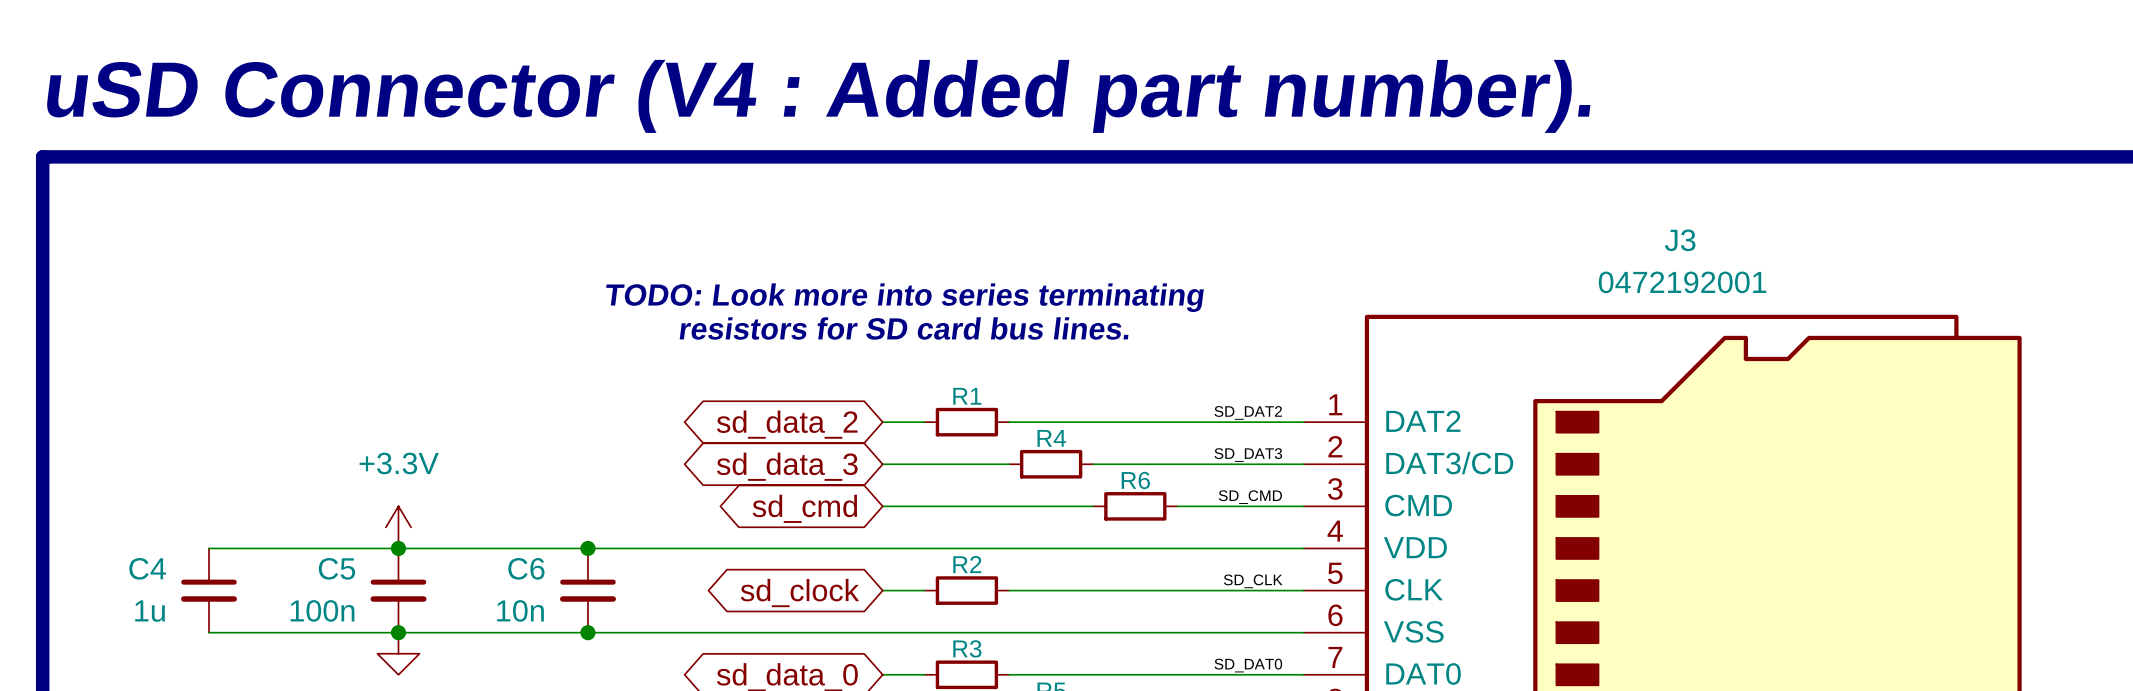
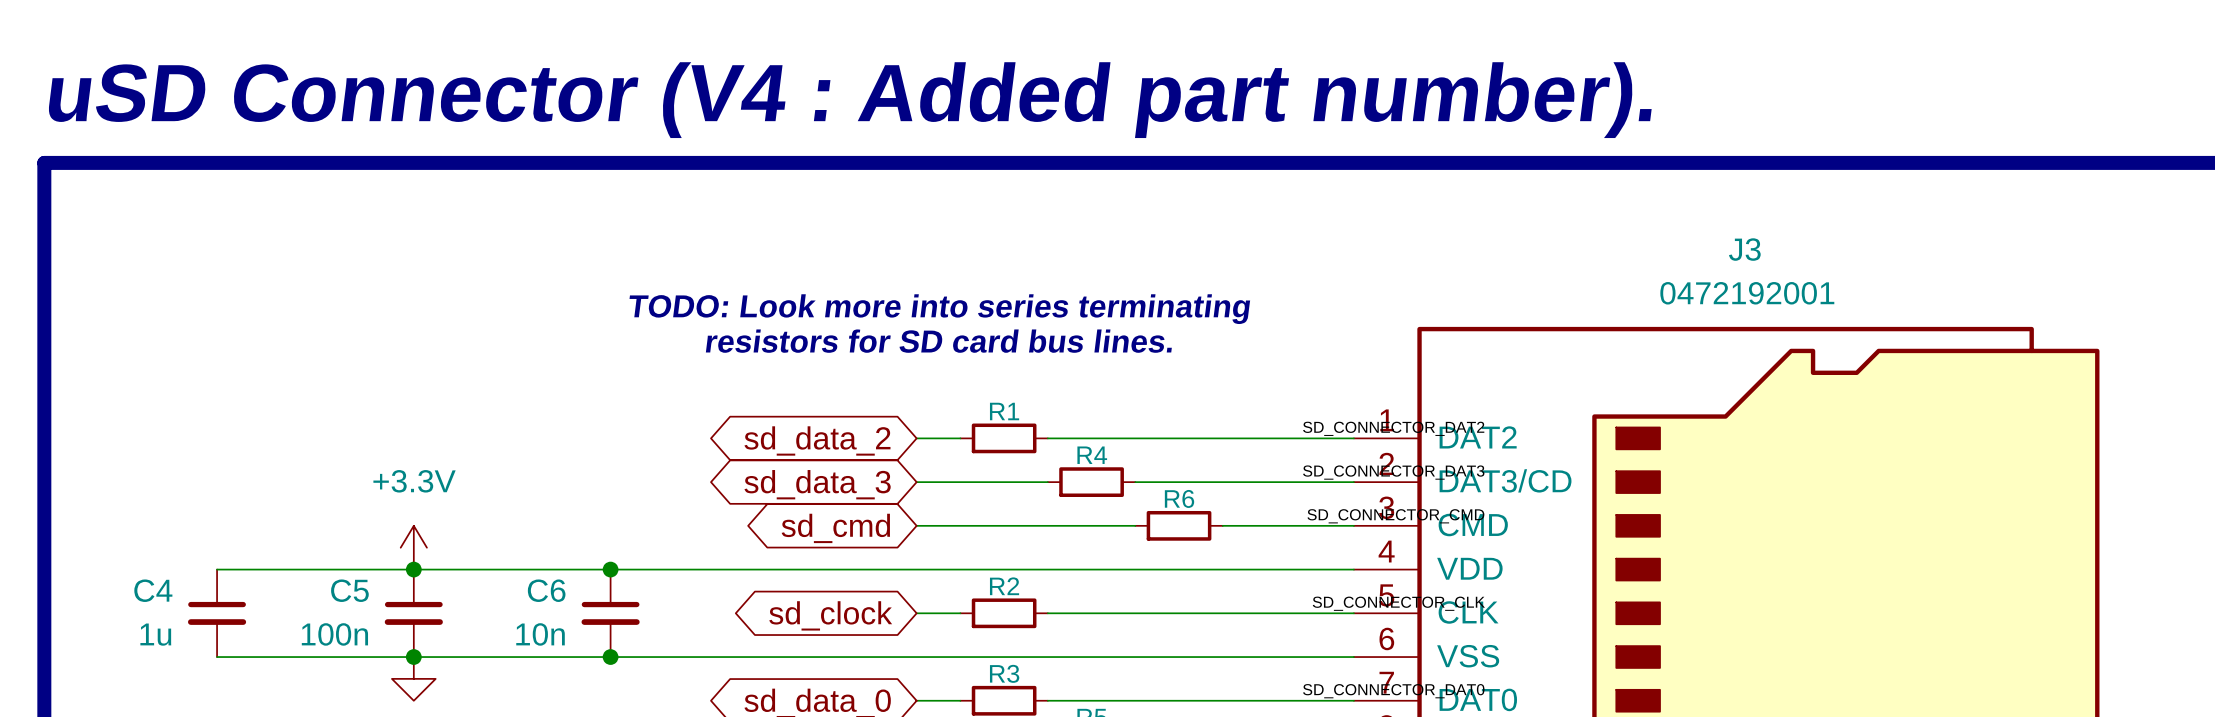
label: SD_DAT2 (1248, 412) -> none
label: none -> SD_CONNECTOR_DAT2 (1393, 428)
label: SD_DAT3 (1248, 455) -> none
label: none -> SD_CONNECTOR_DAT3 (1393, 472)
label: SD_CMD (1250, 497) -> none
label: none -> SD_CONNECTOR_CMD (1395, 516)
label: SD_CLK (1253, 581) -> none
label: none -> SD_CONNECTOR_CLK (1398, 603)
label: SD_DAT0 (1248, 665) -> none
label: none -> SD_CONNECTOR_DAT0 (1393, 691)

